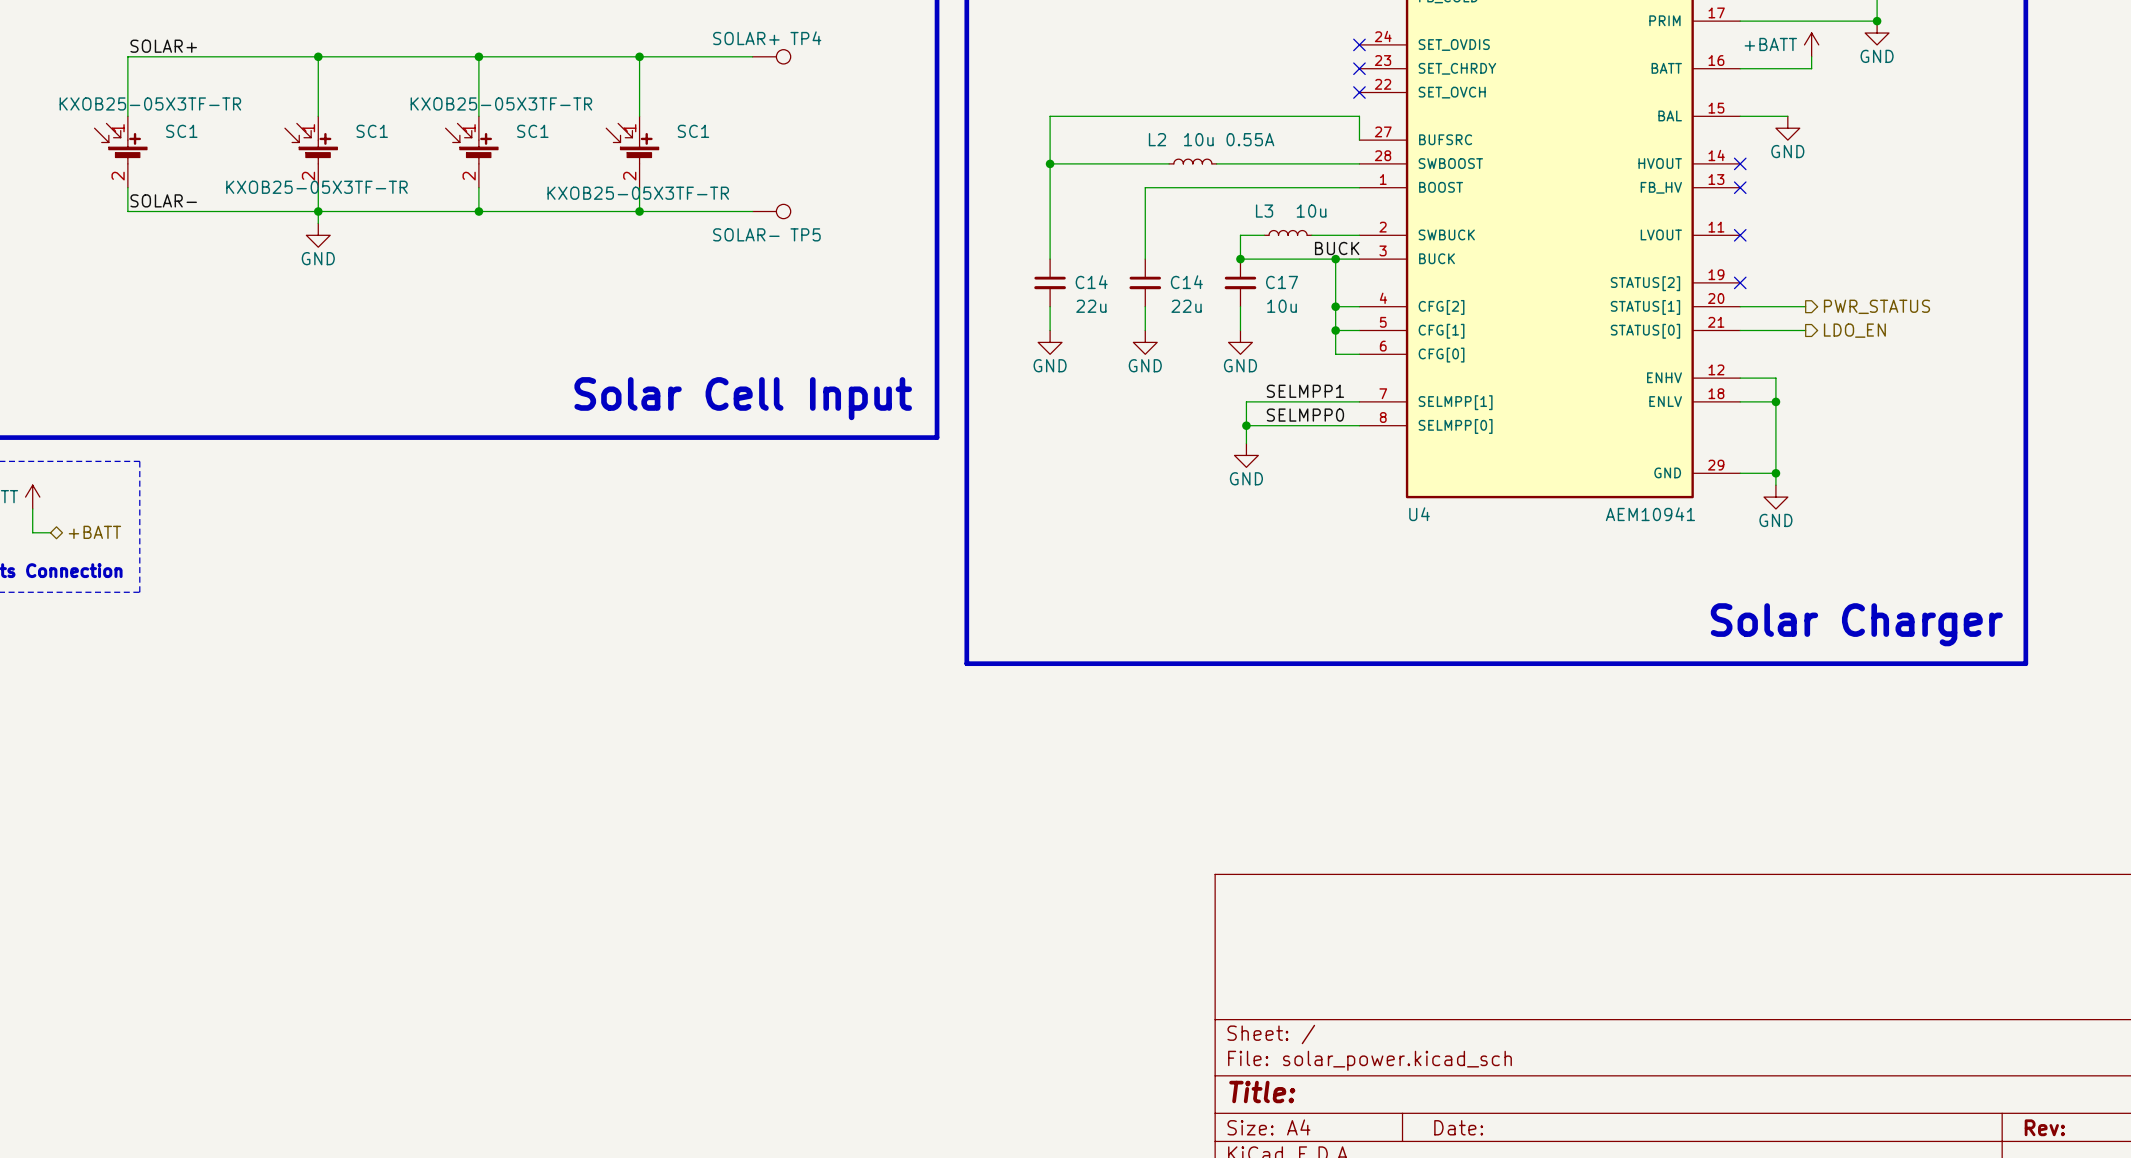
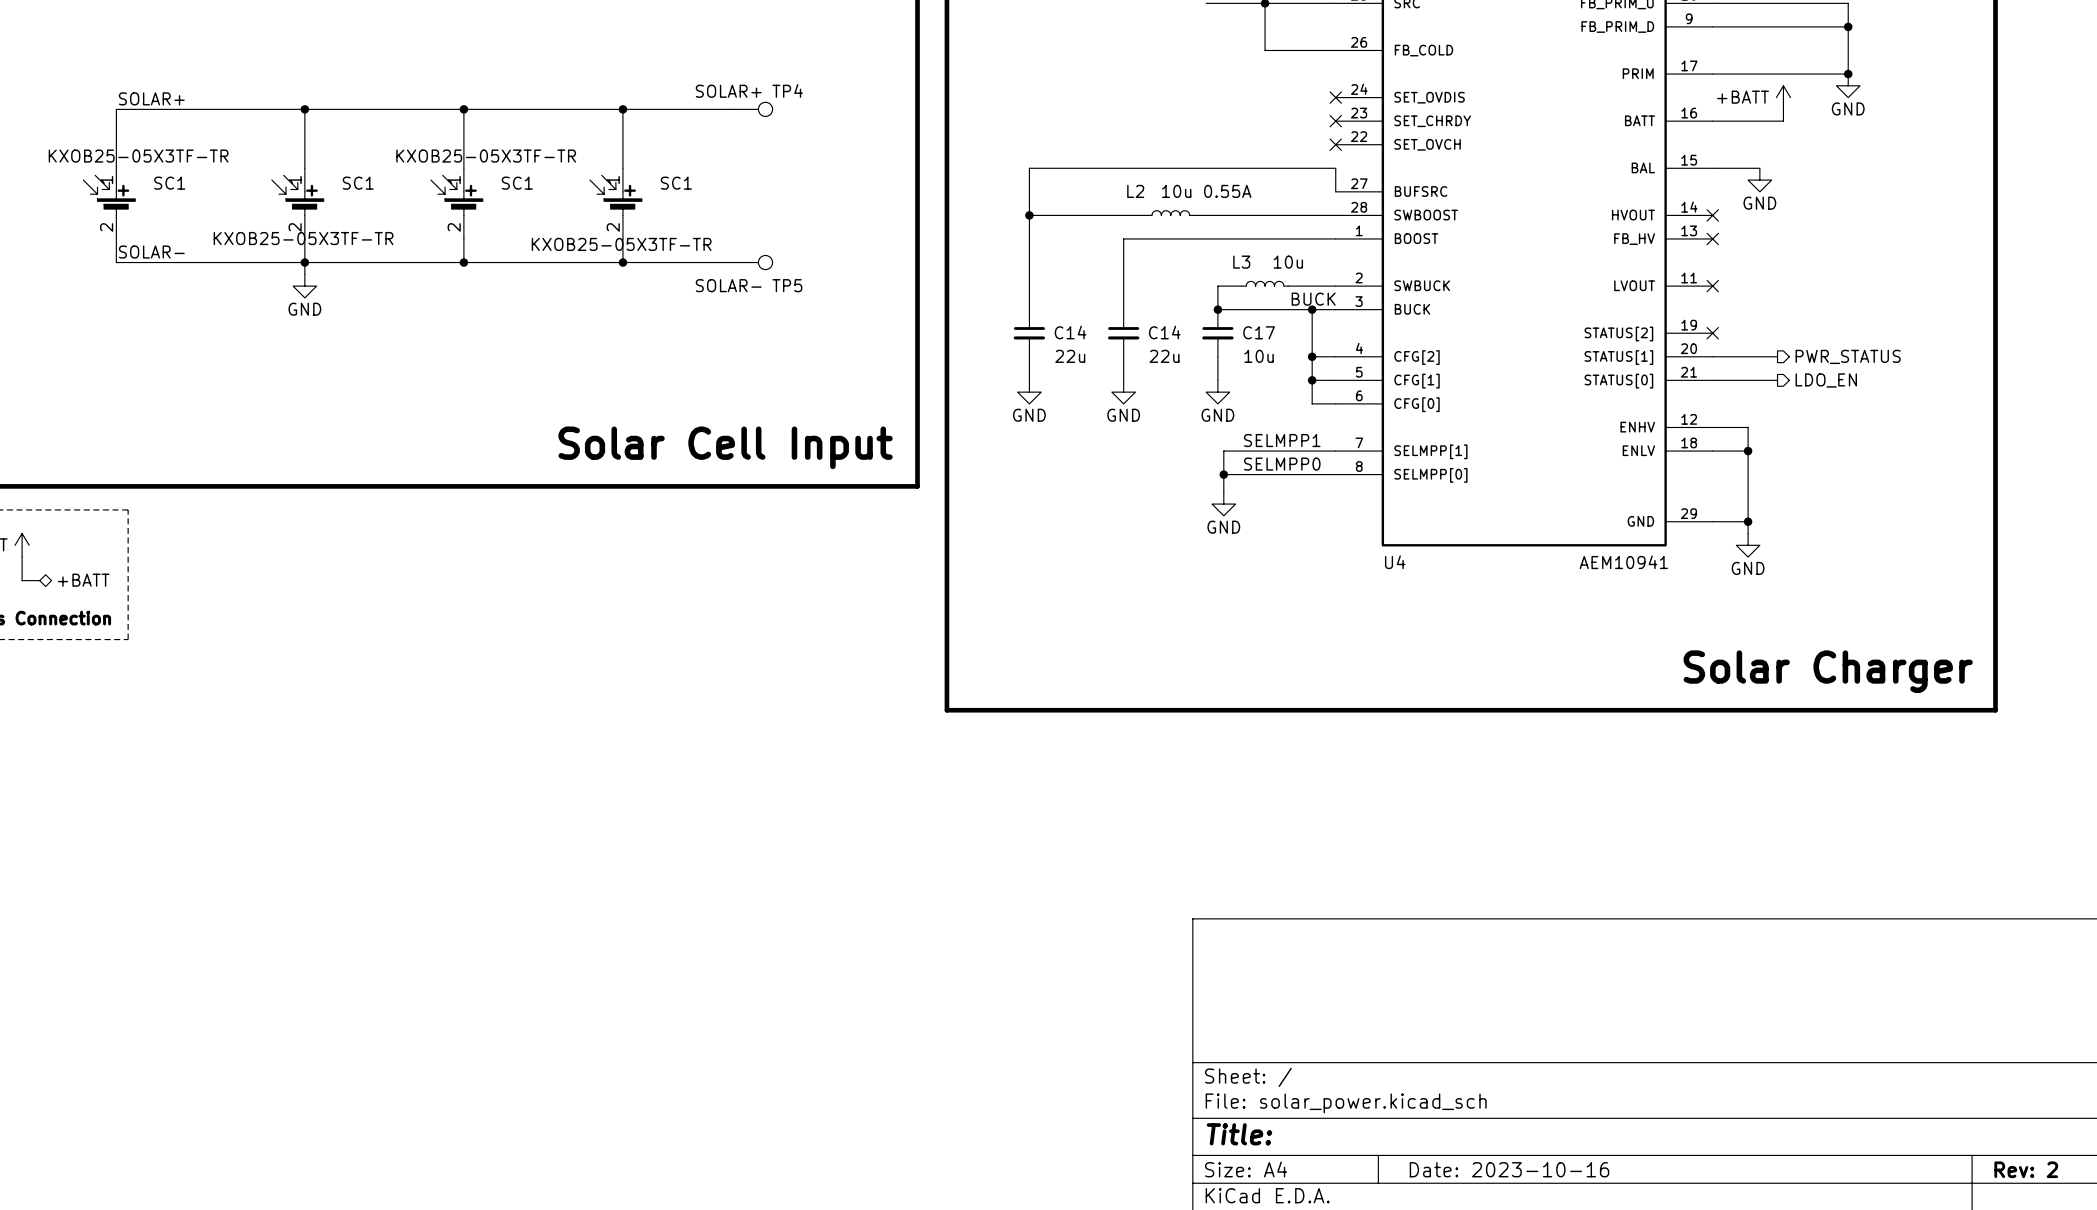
title block: Date: (1458, 1127) -> Date: 2023-10-16 (1509, 1169)
title block: Rev: (2044, 1127) -> Rev: 2 (2026, 1169)

